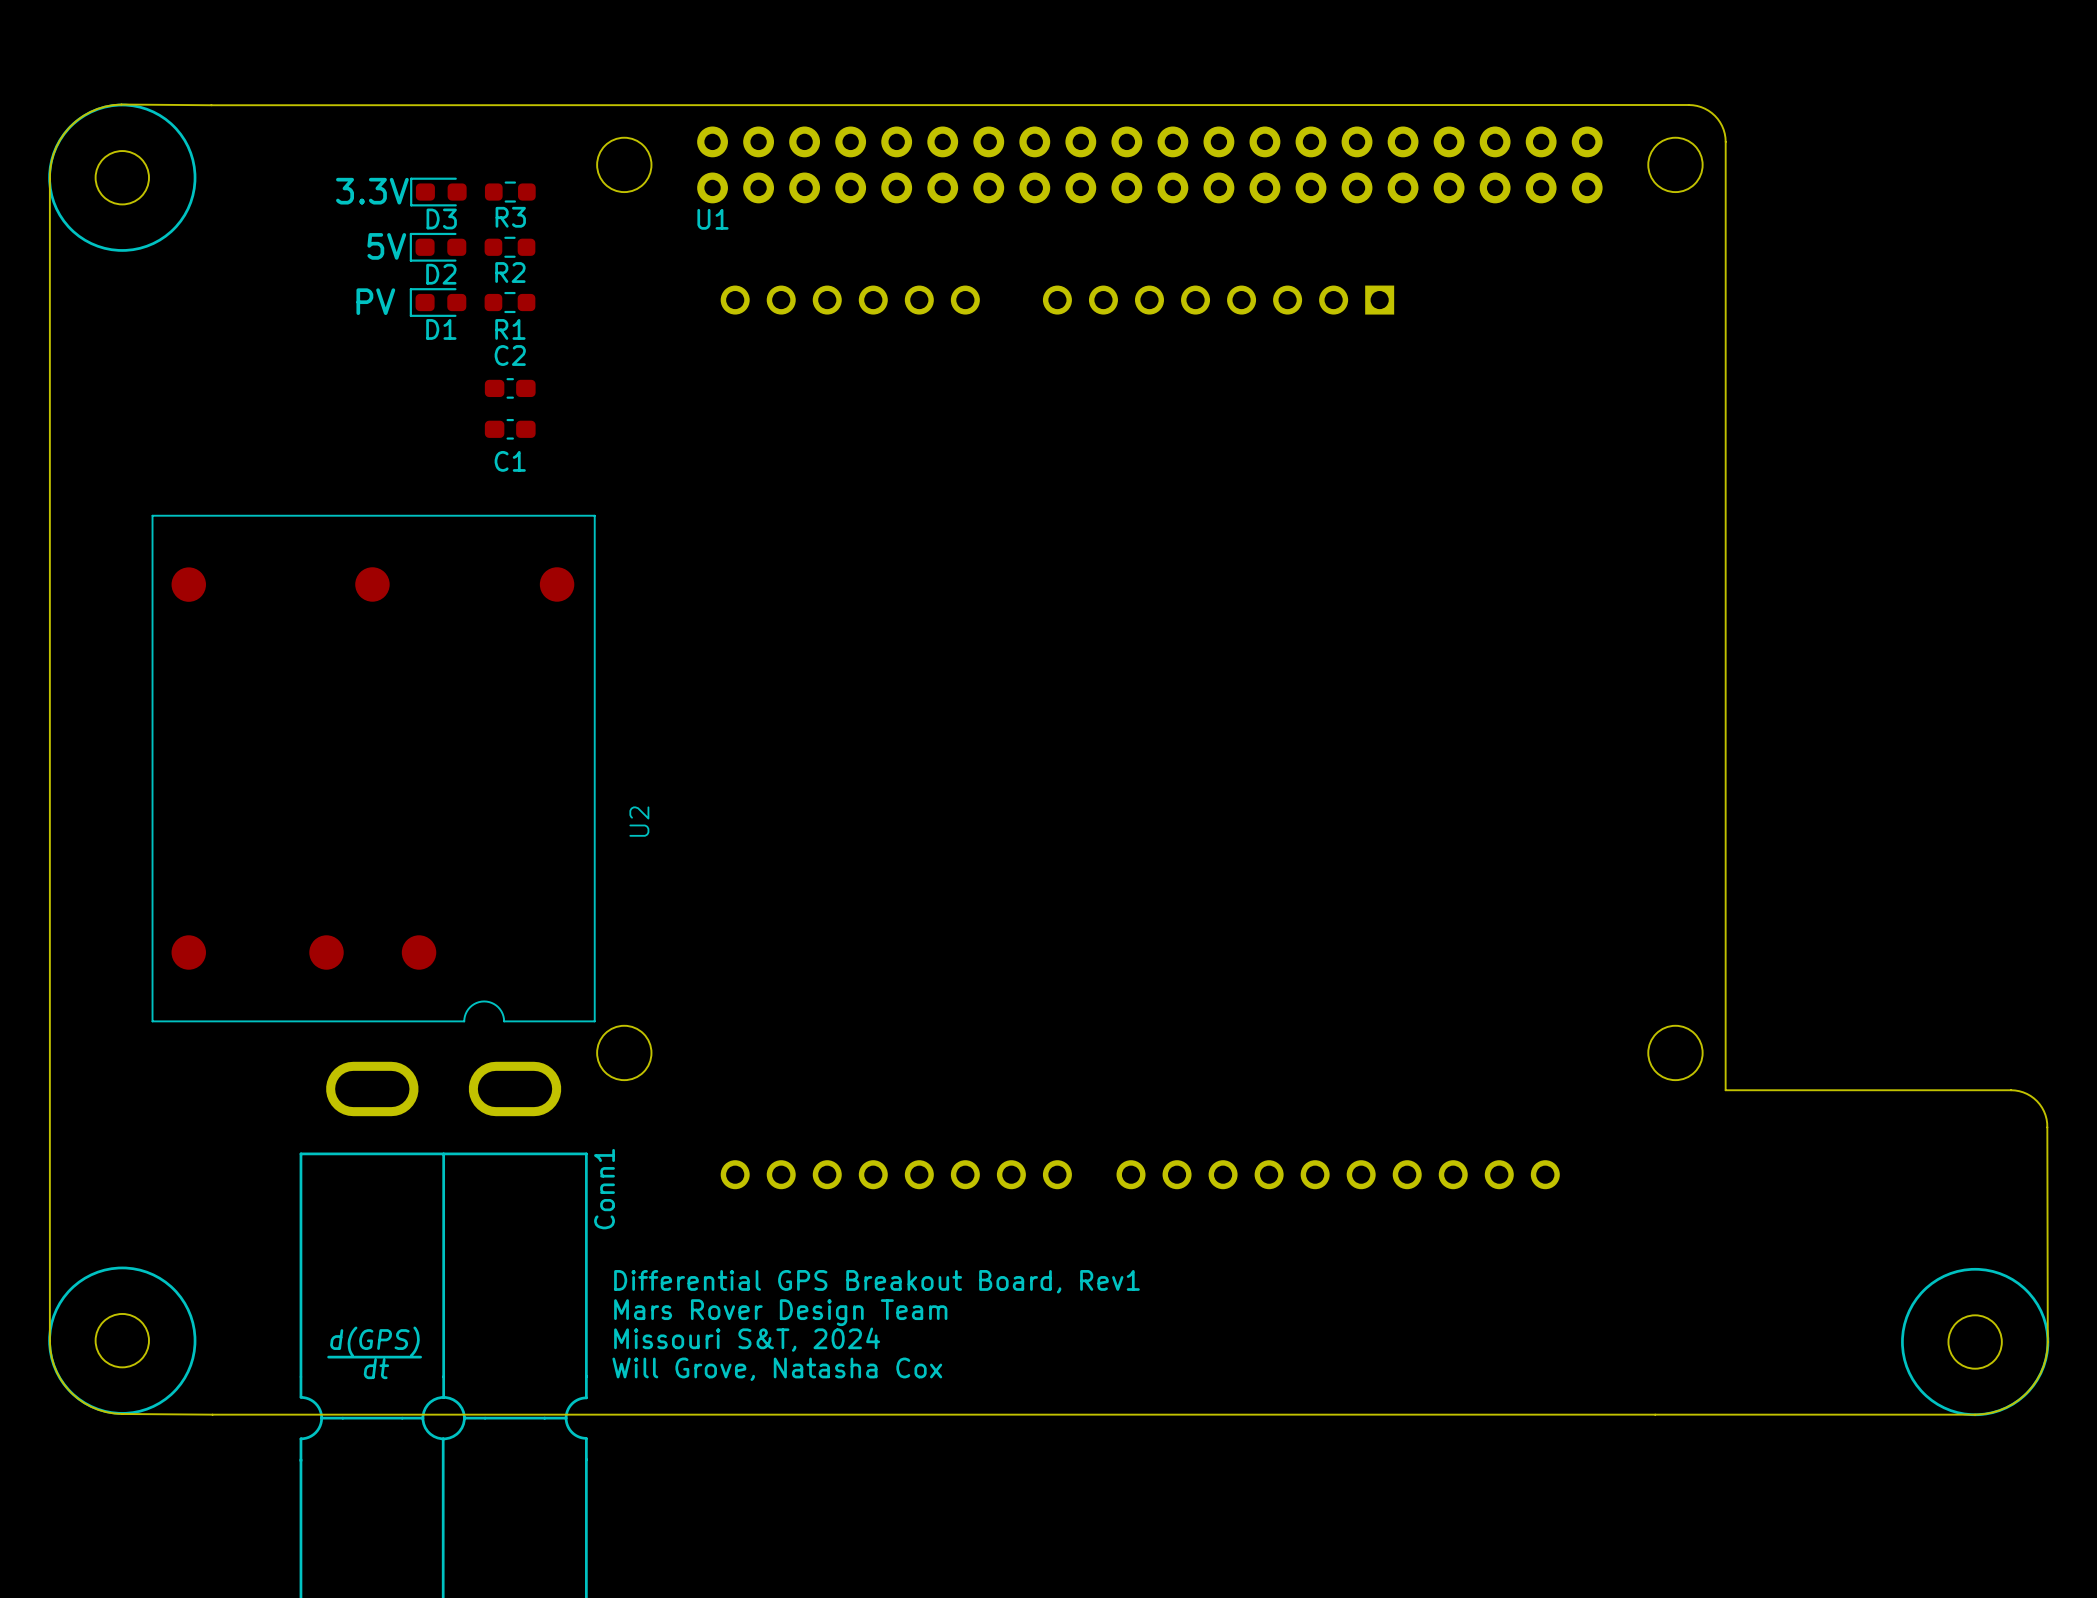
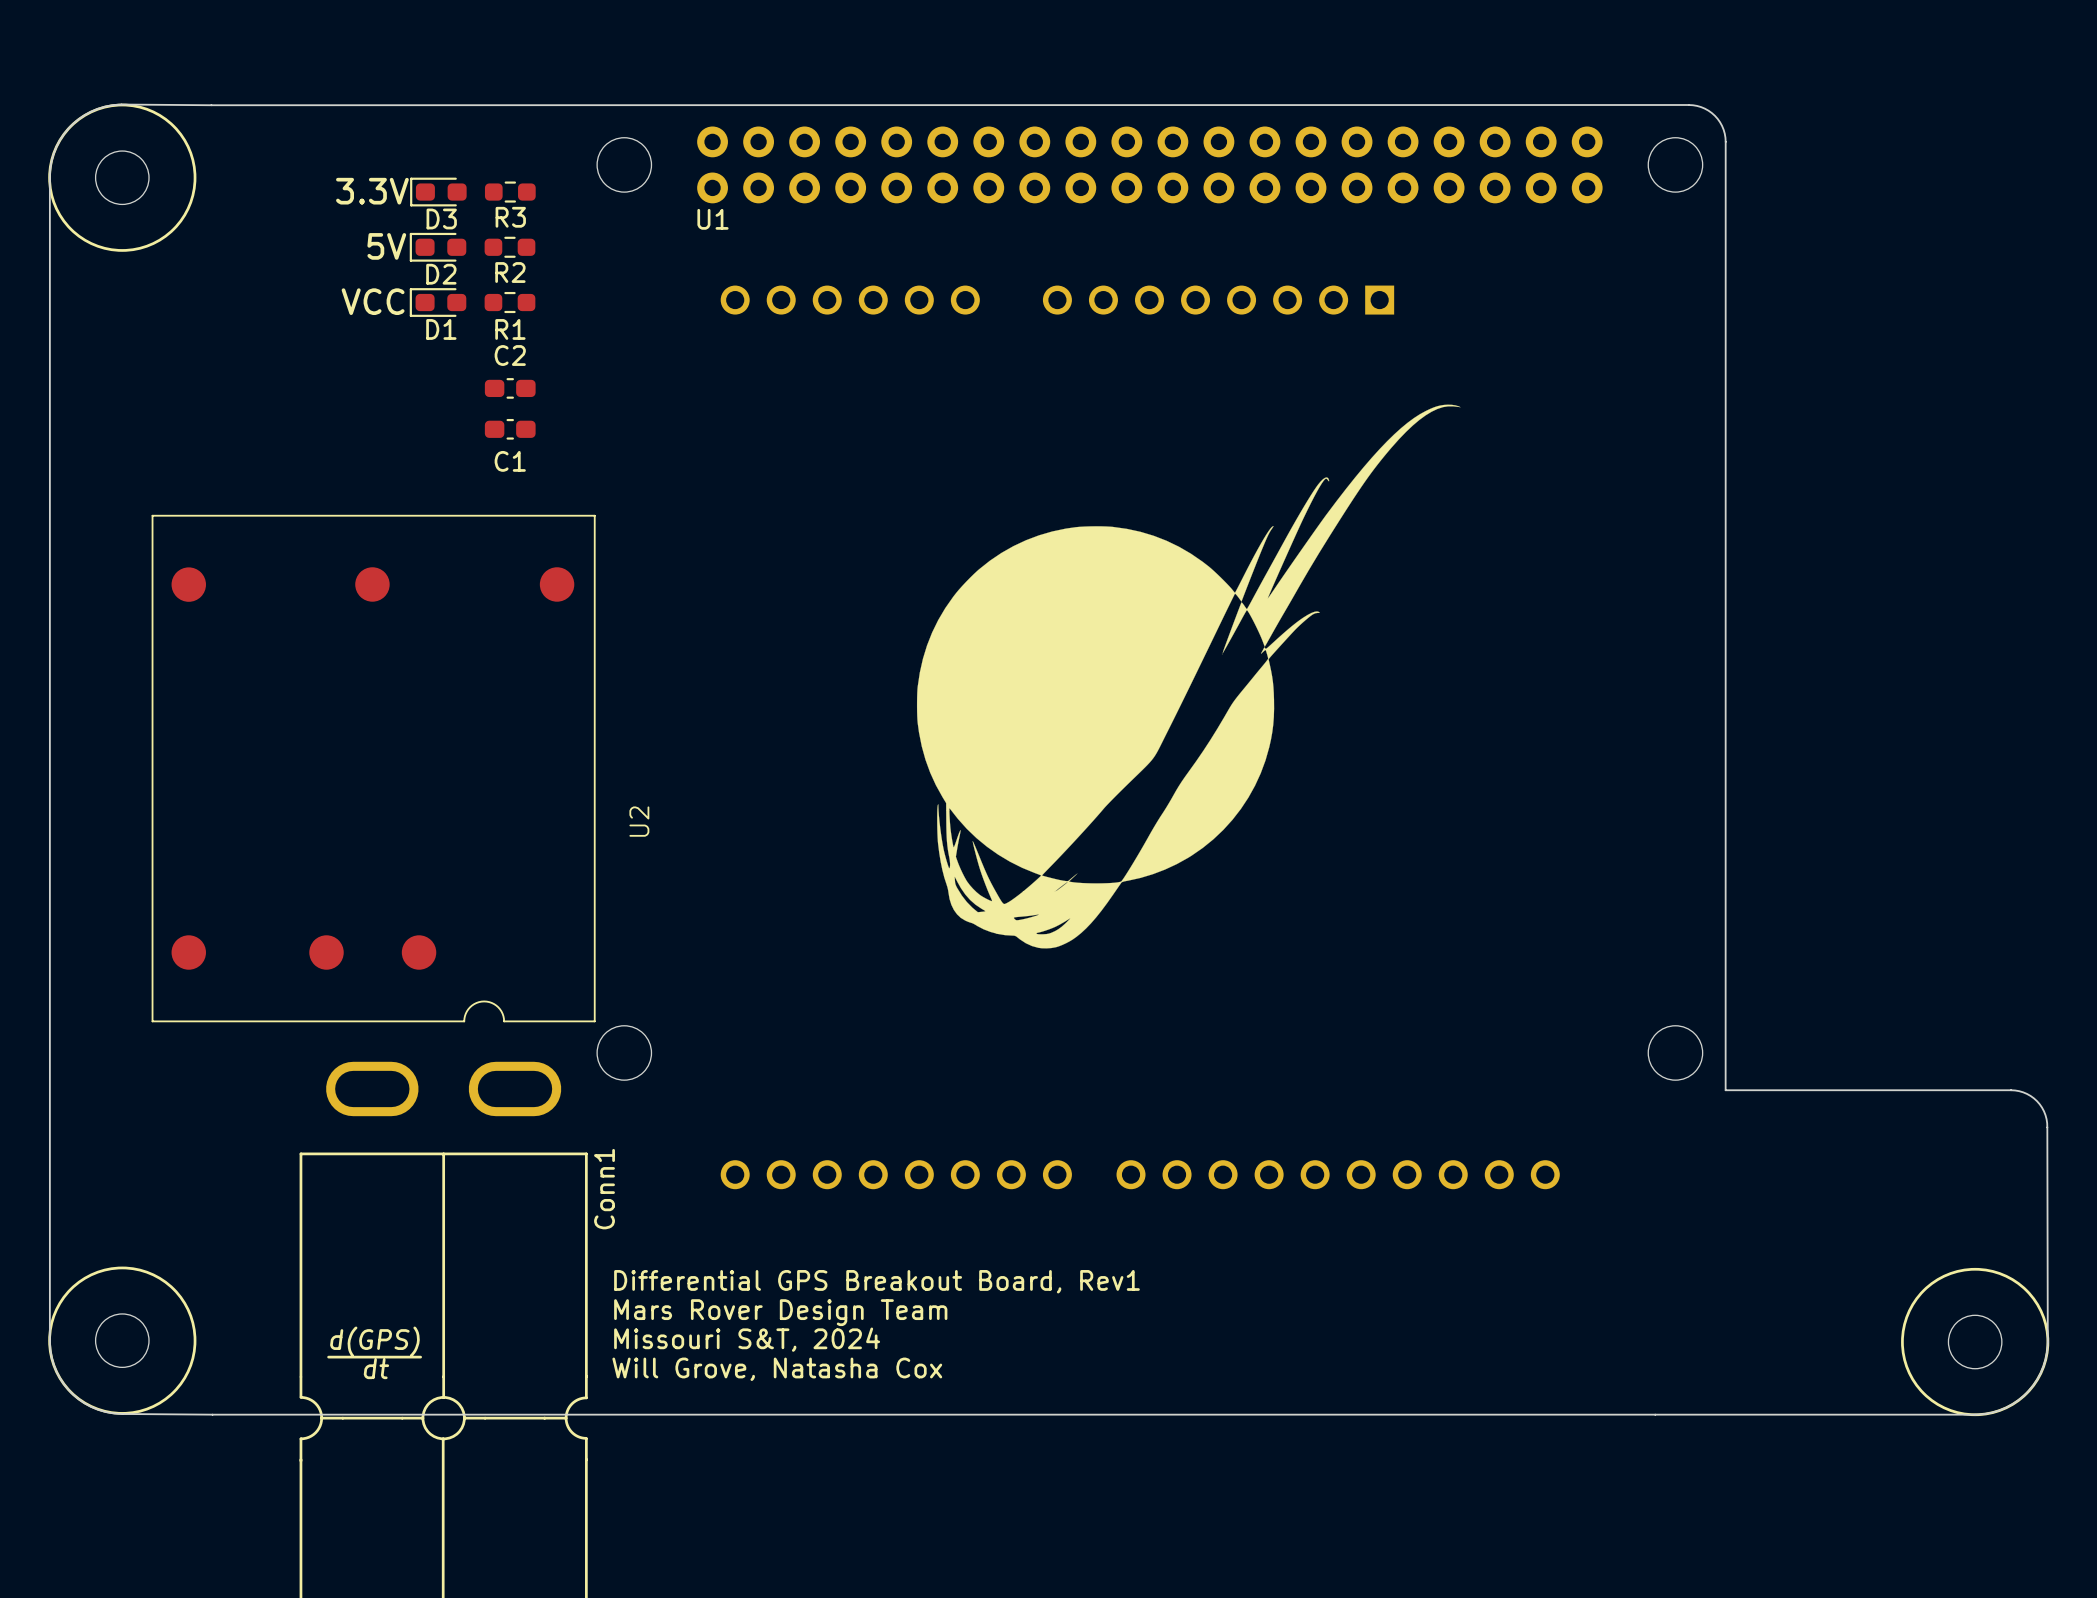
text: PV (375, 301) -> VCC (373, 301)
drawing: none -> [916, 404, 1461, 949]

